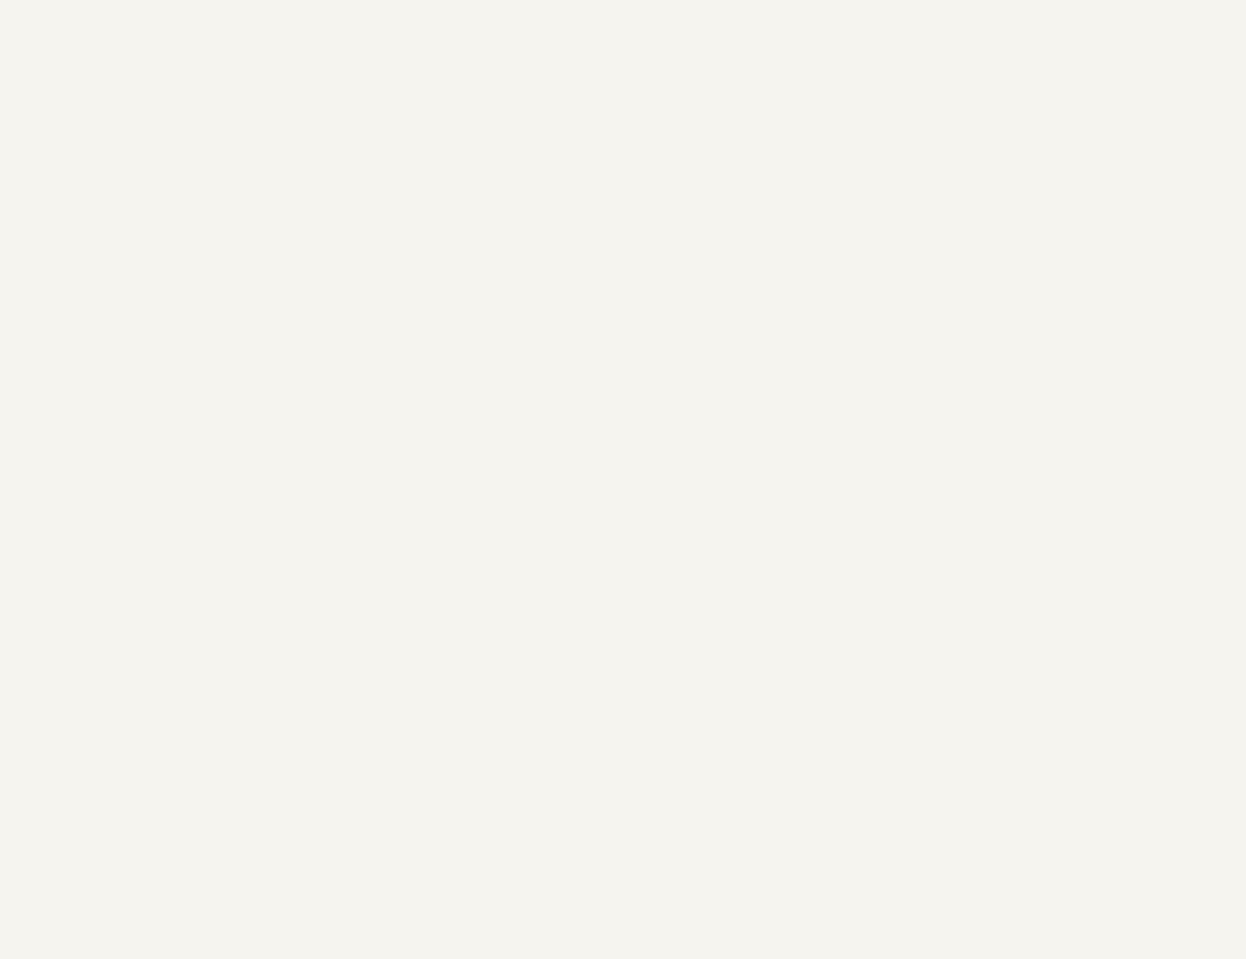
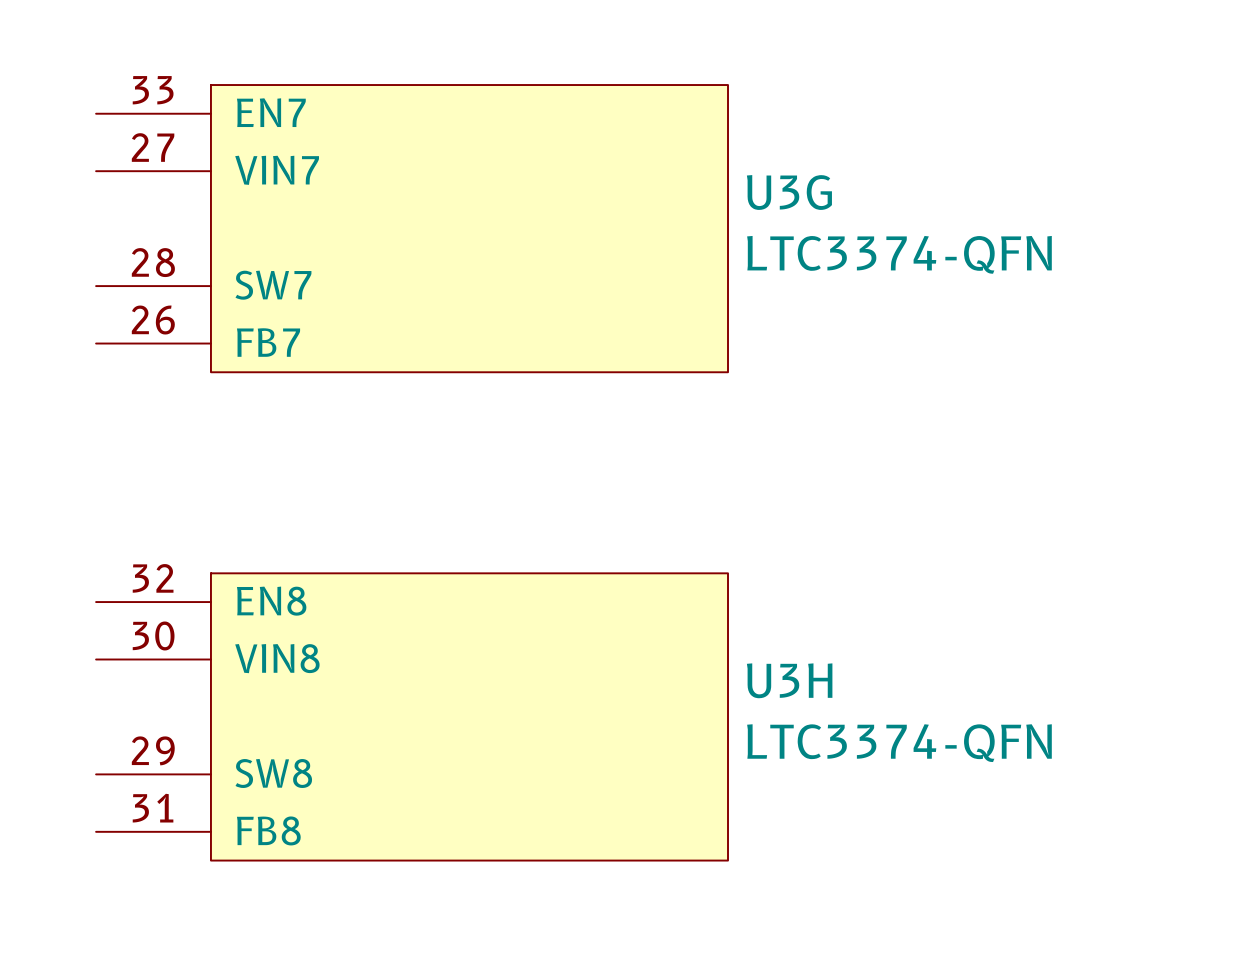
U3G: none -> LTC3374-QFN (412, 228)
U3H: none -> LTC3374-QFN (412, 716)

